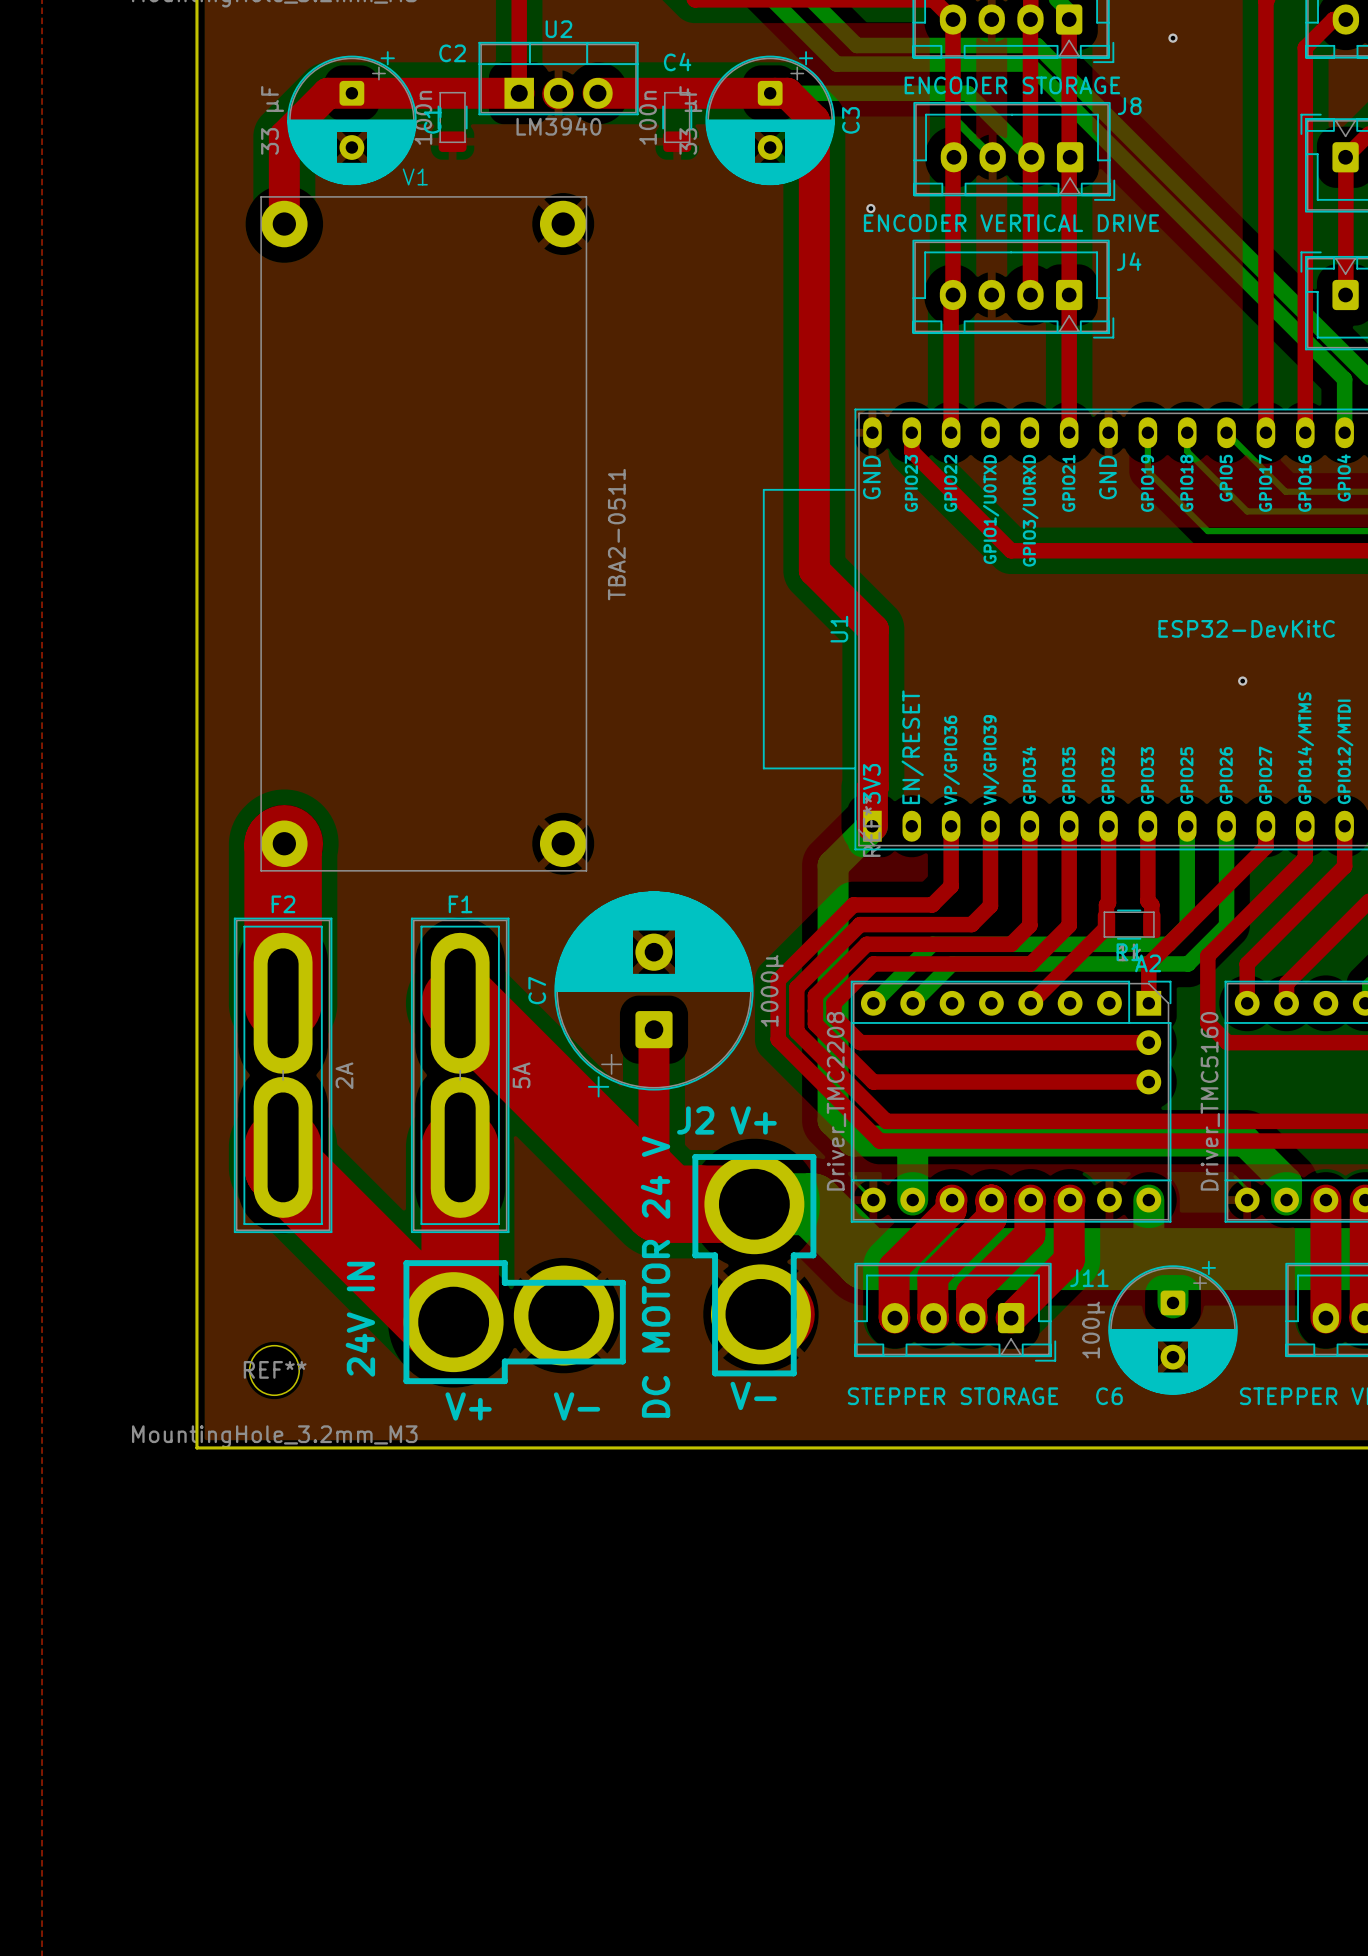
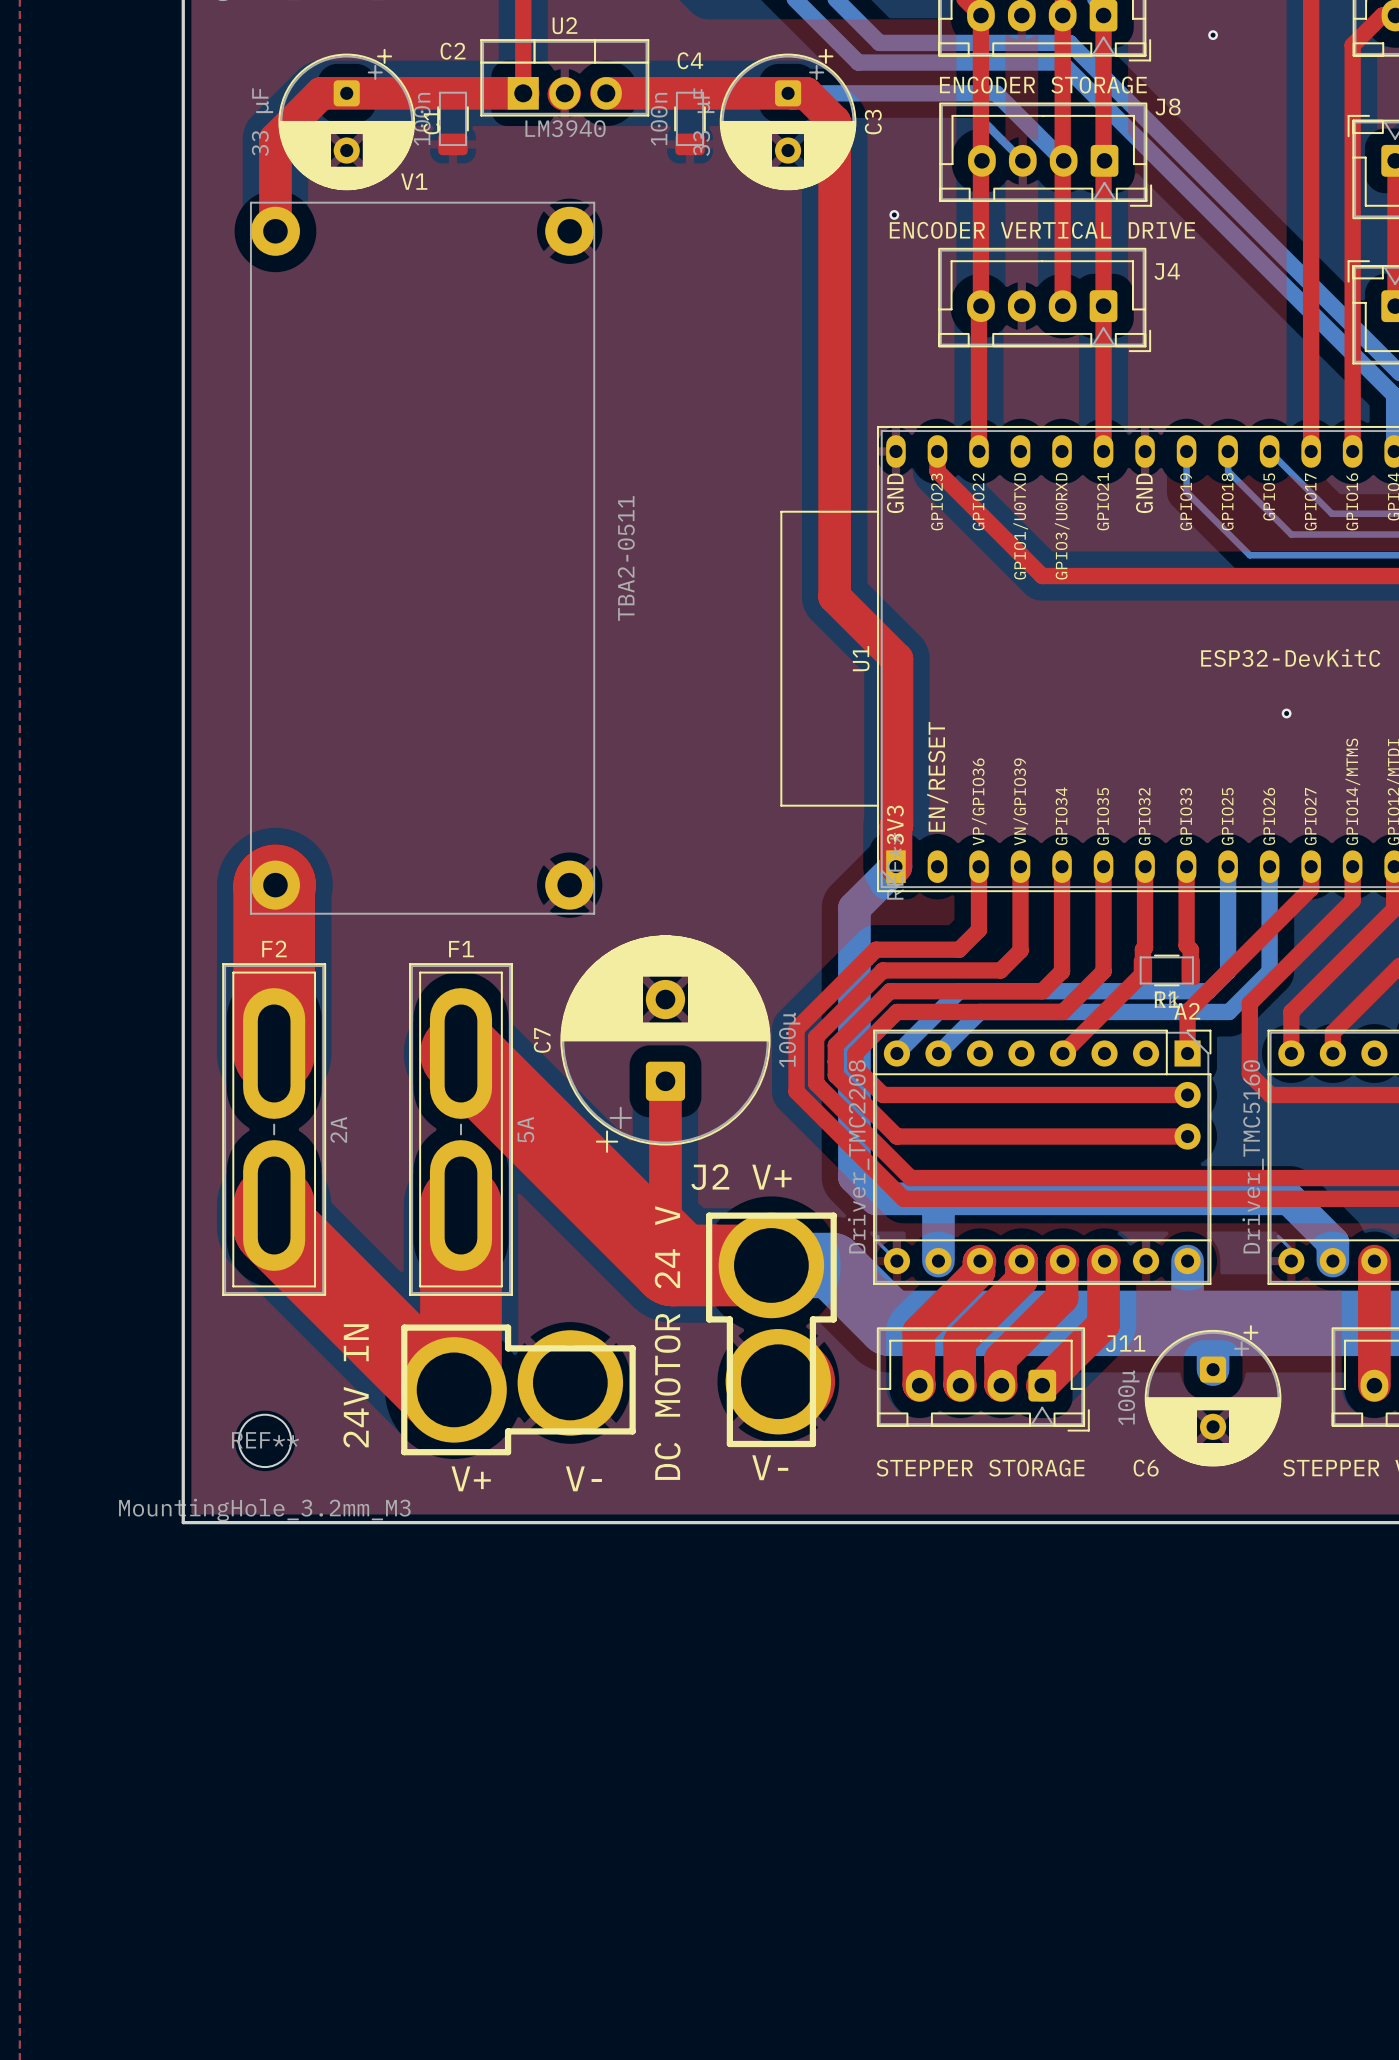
F2 footprint: [233, 917, 333, 1234] -> [222, 963, 327, 1296]
F1 footprint: [410, 917, 510, 1234] -> [409, 963, 513, 1296]
C7 value: 1000μ (772, 990) -> 100μ (789, 1040)

